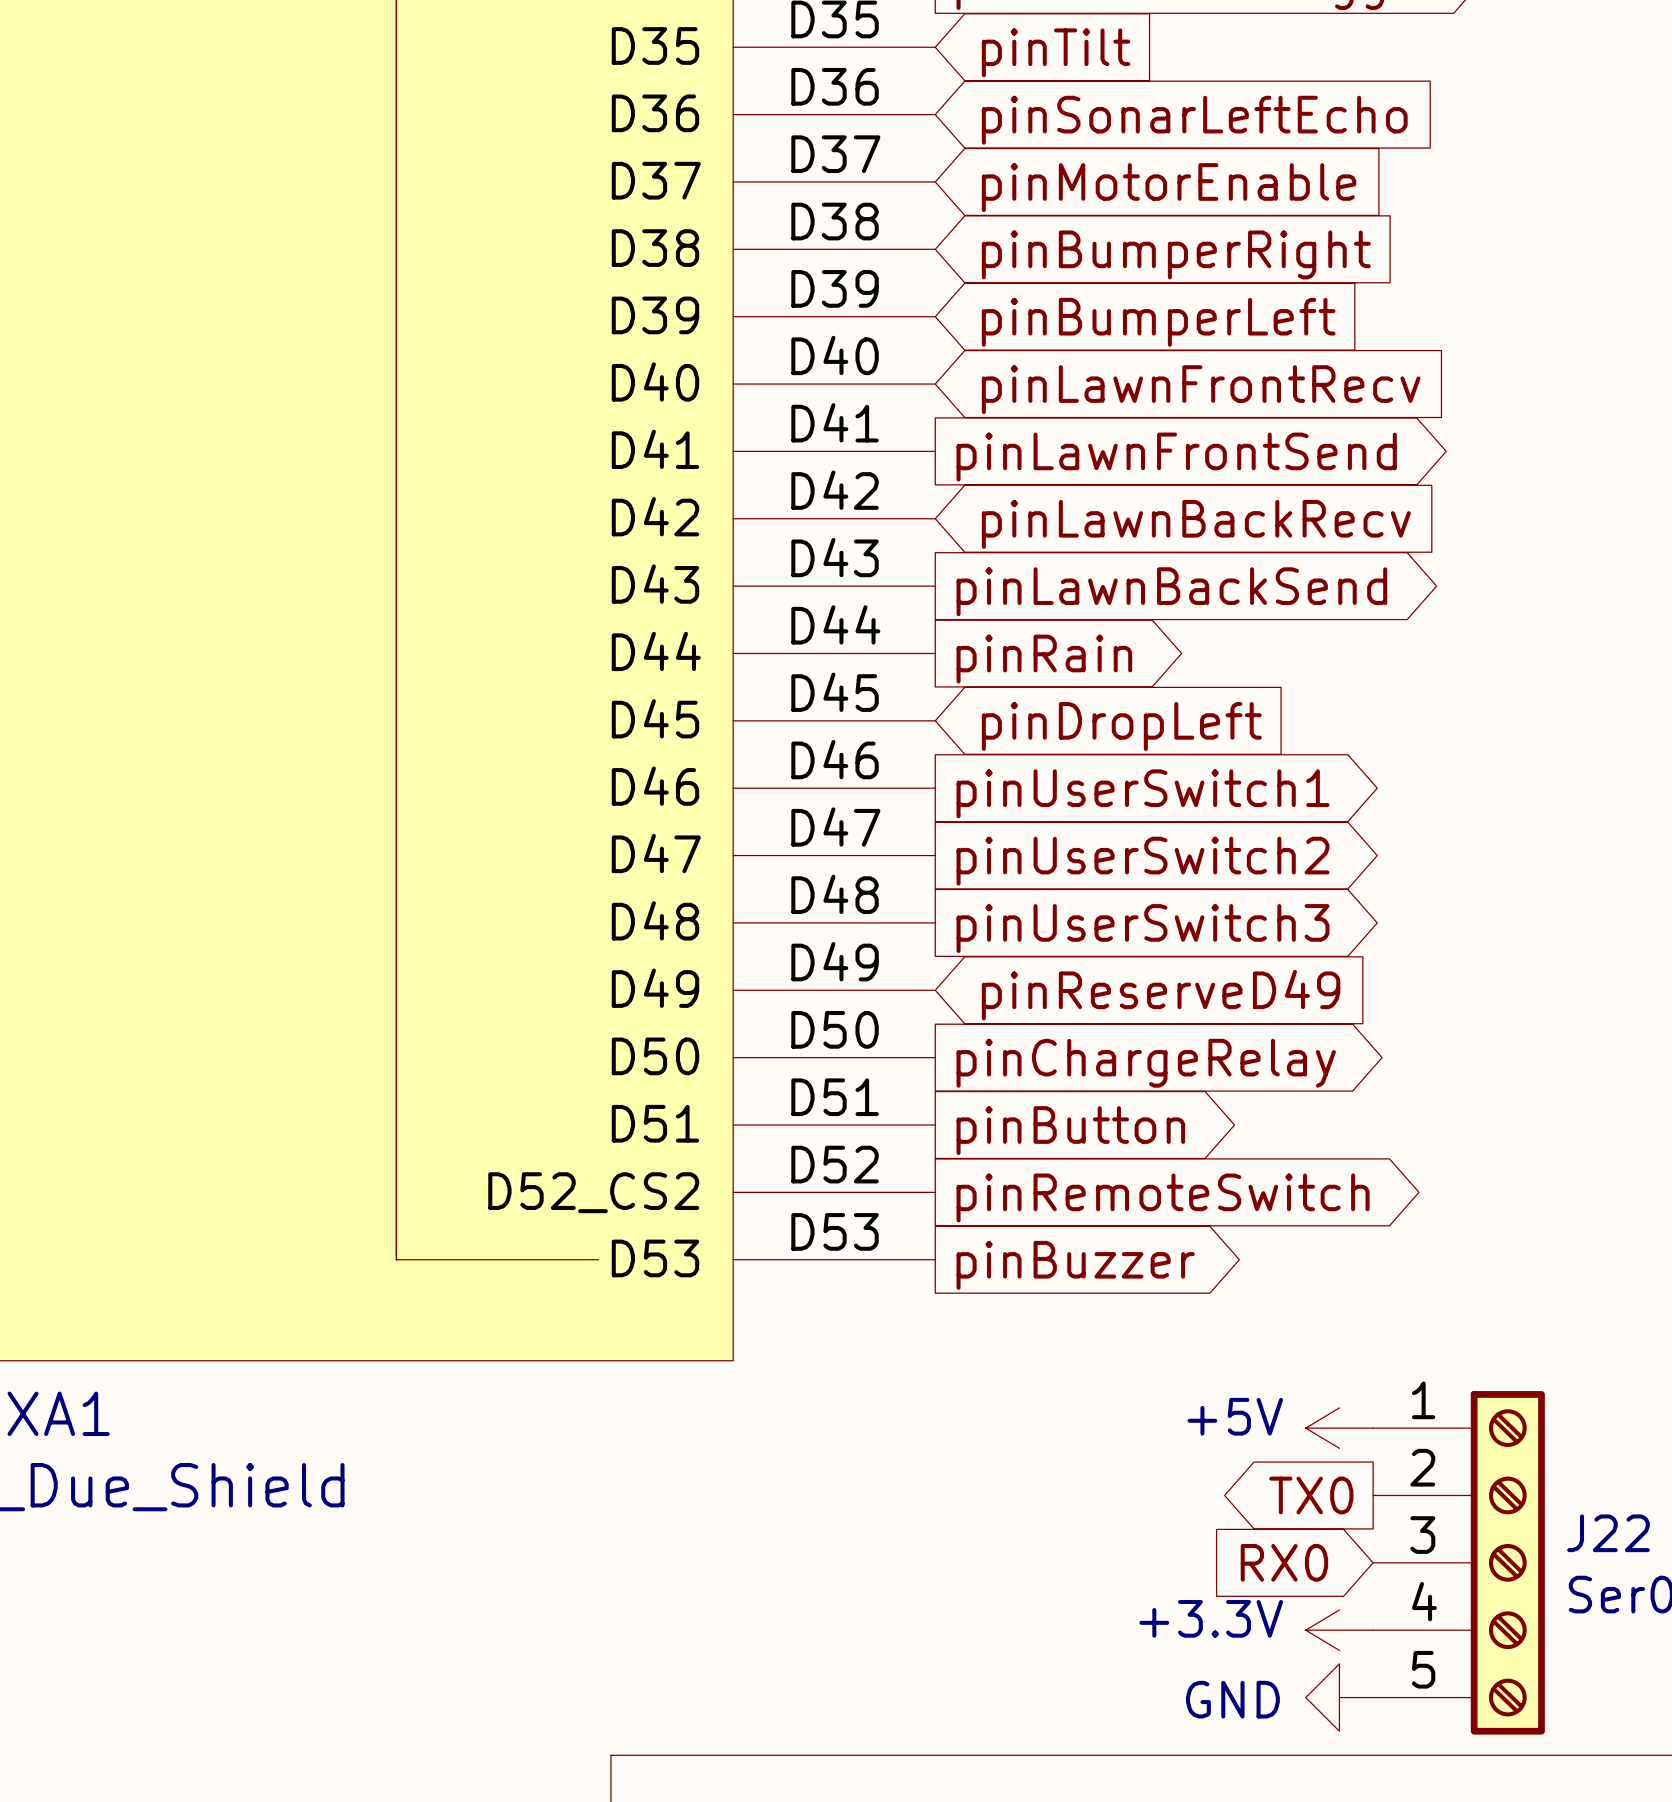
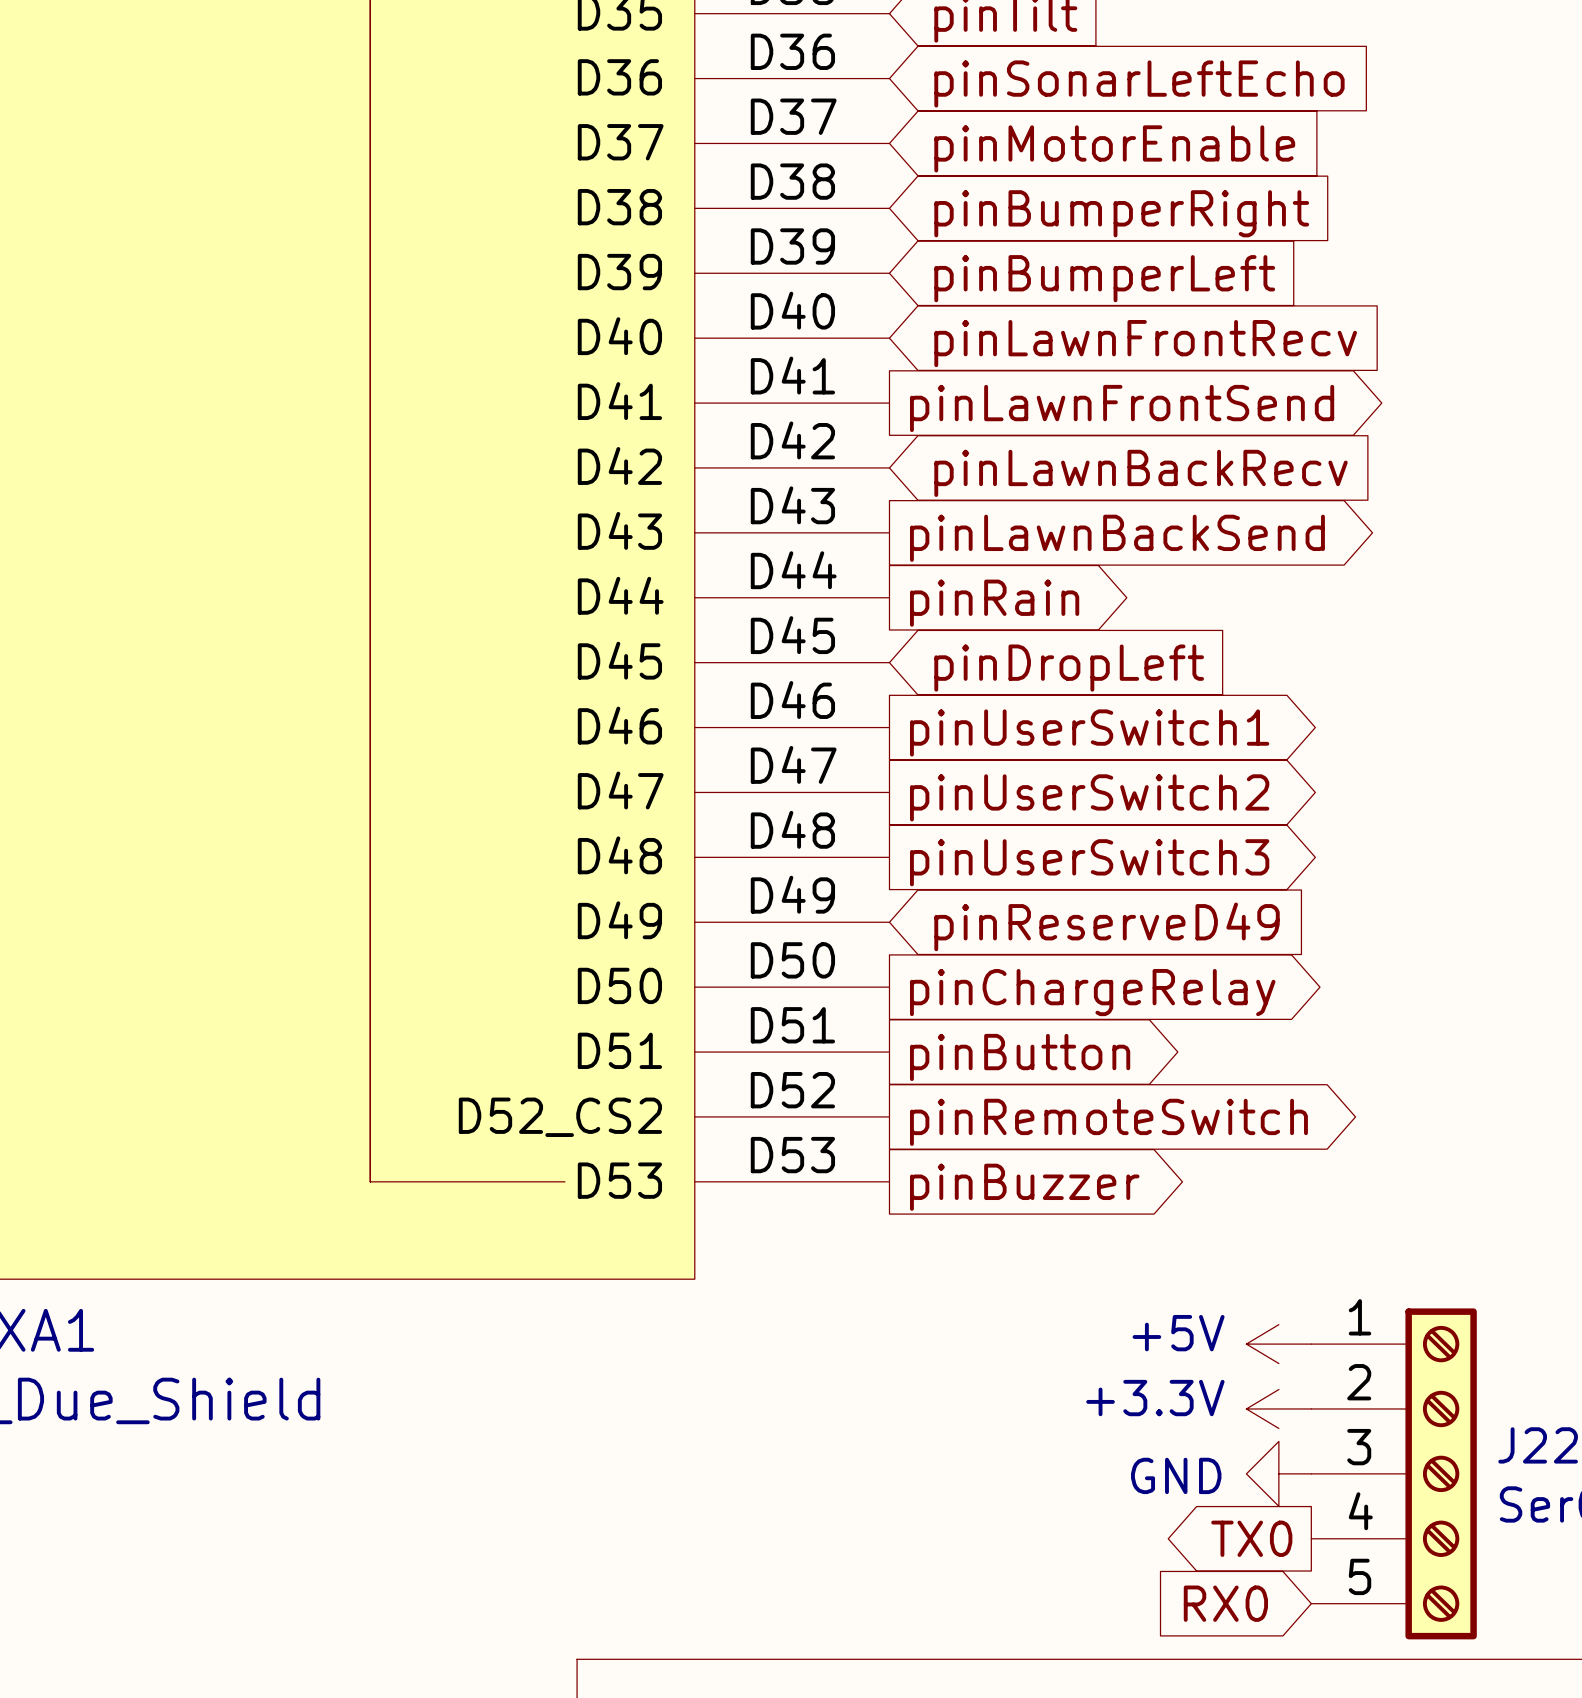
global label position: TX0 (1311, 1495) -> TX0 (1251, 1538)
global label position: RX0 (1284, 1562) -> RX0 (1225, 1603)
power symbol position: +3.3V (1339, 1630) -> +3.3V (1278, 1408)
power symbol position: GND (1339, 1697) -> GND (1278, 1473)

